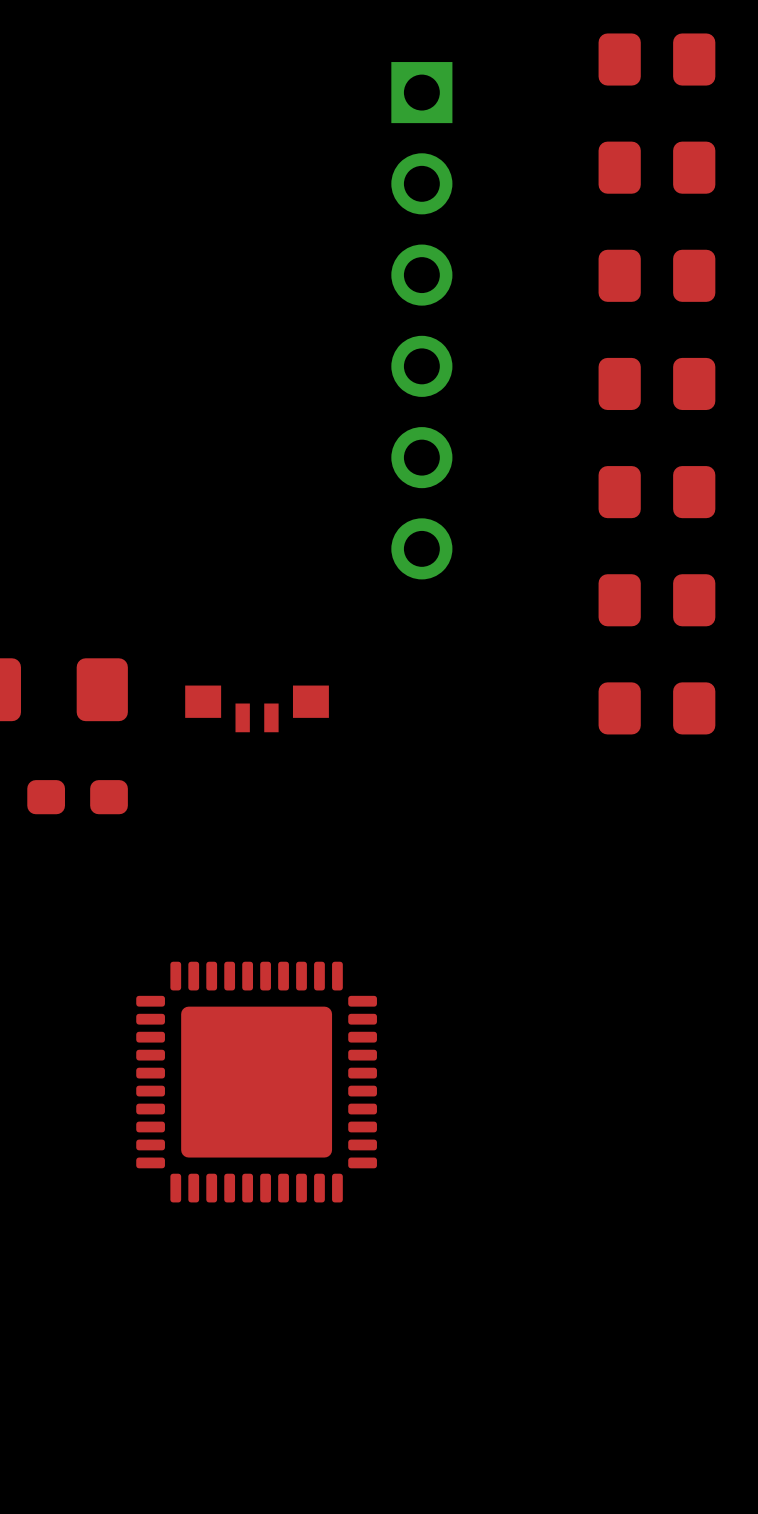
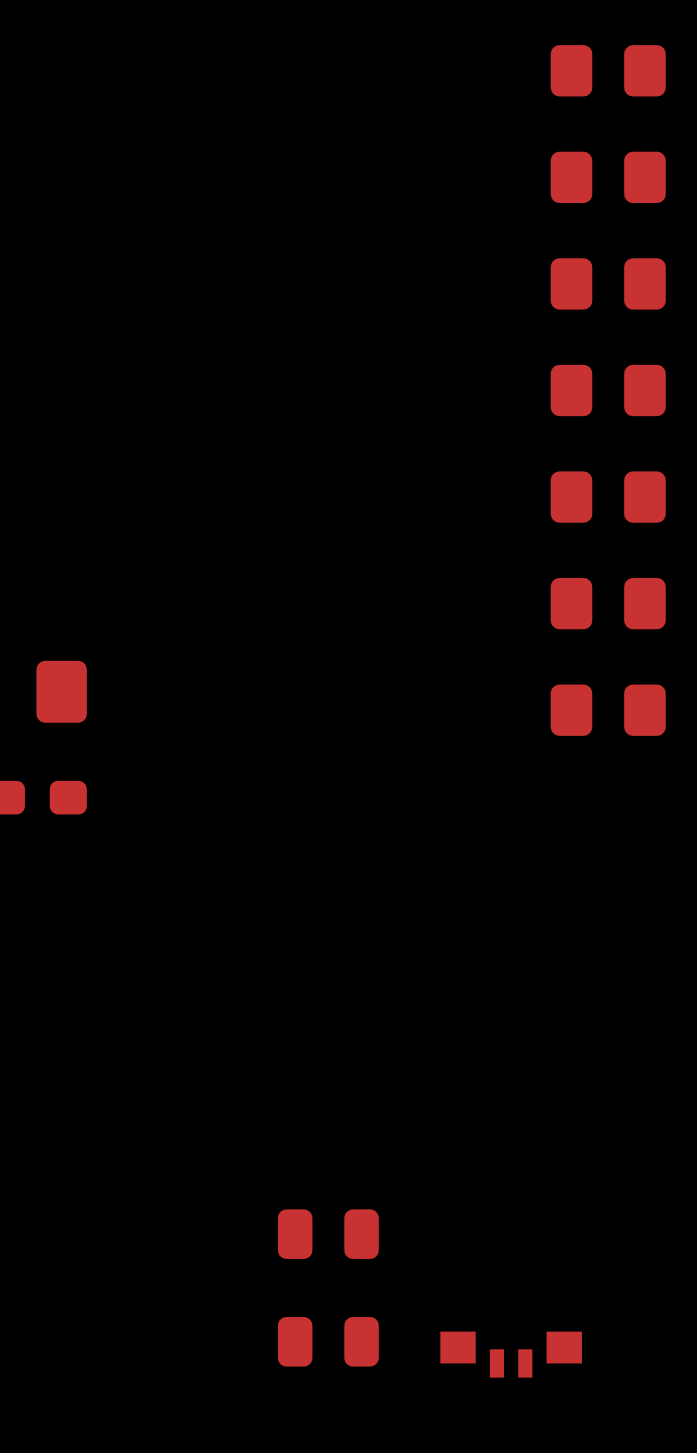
part: (421, 320) -> none
part position: (257, 708) -> (511, 1354)
part: (256, 1082) -> none
part: none -> (328, 1234)
part: none -> (328, 1341)

